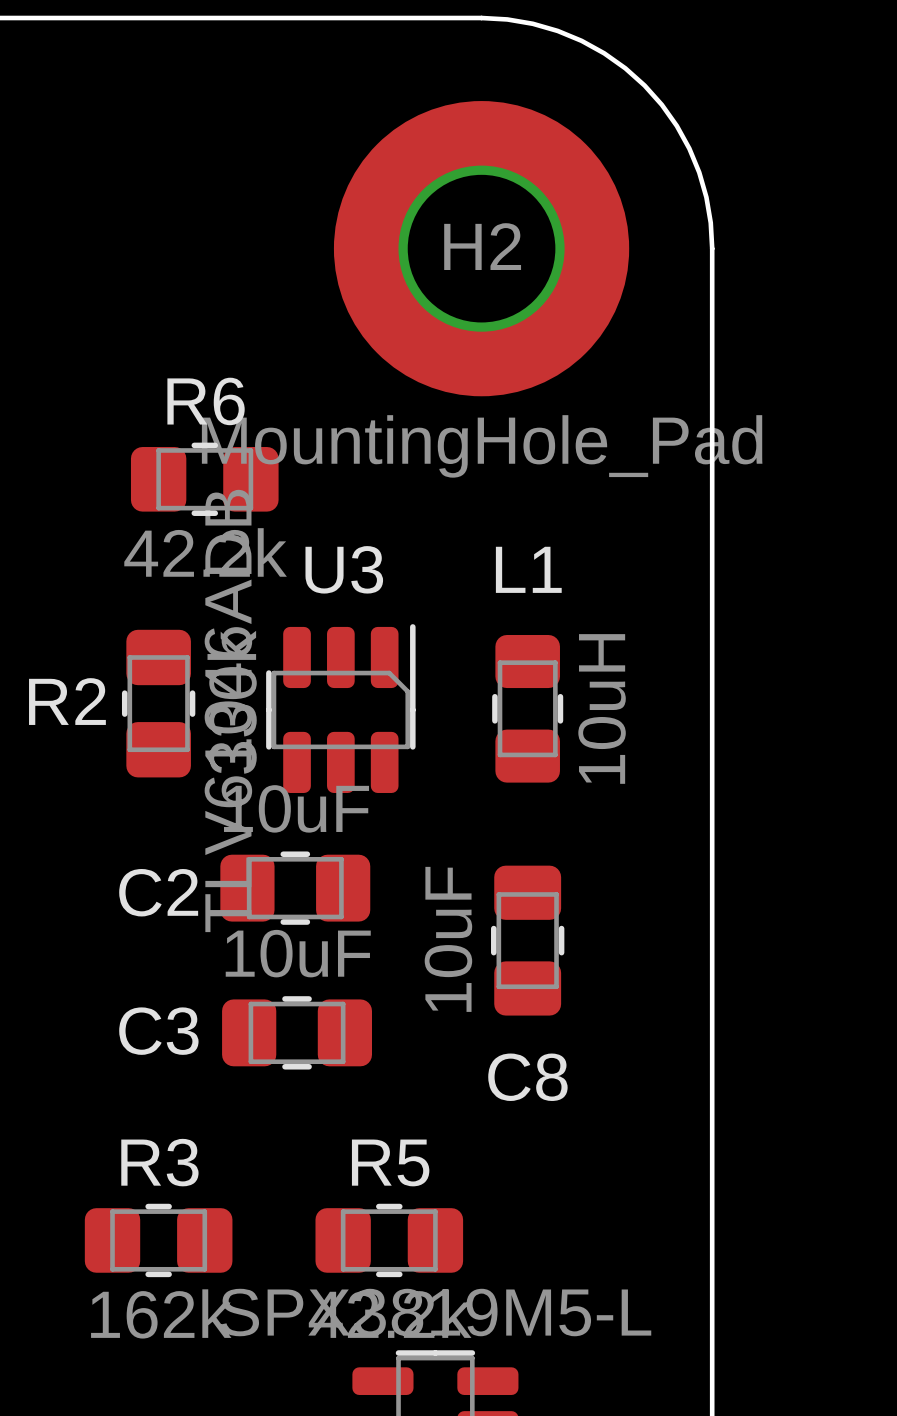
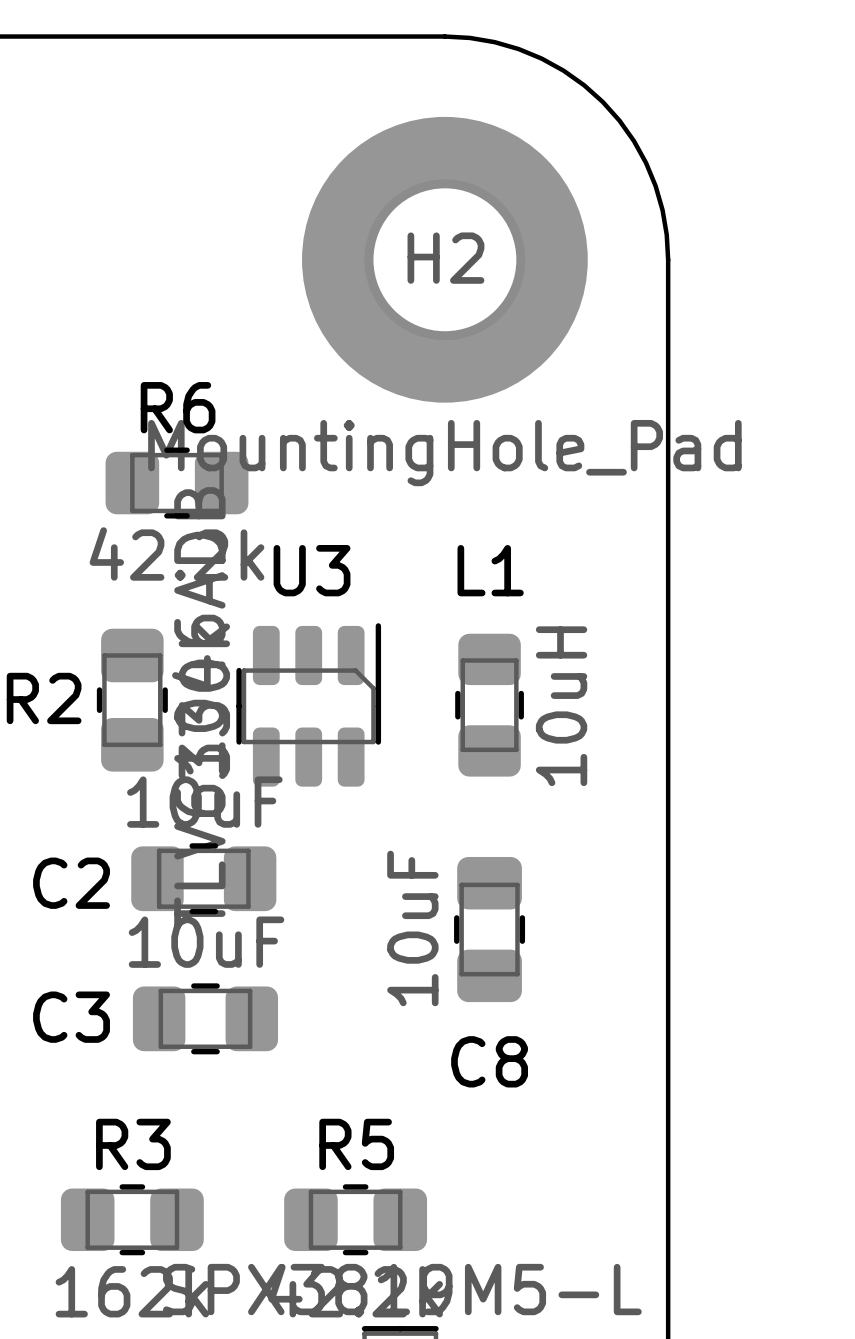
C2 position: (295, 888) -> (203, 878)
C3 position: (297, 1032) -> (205, 1018)

